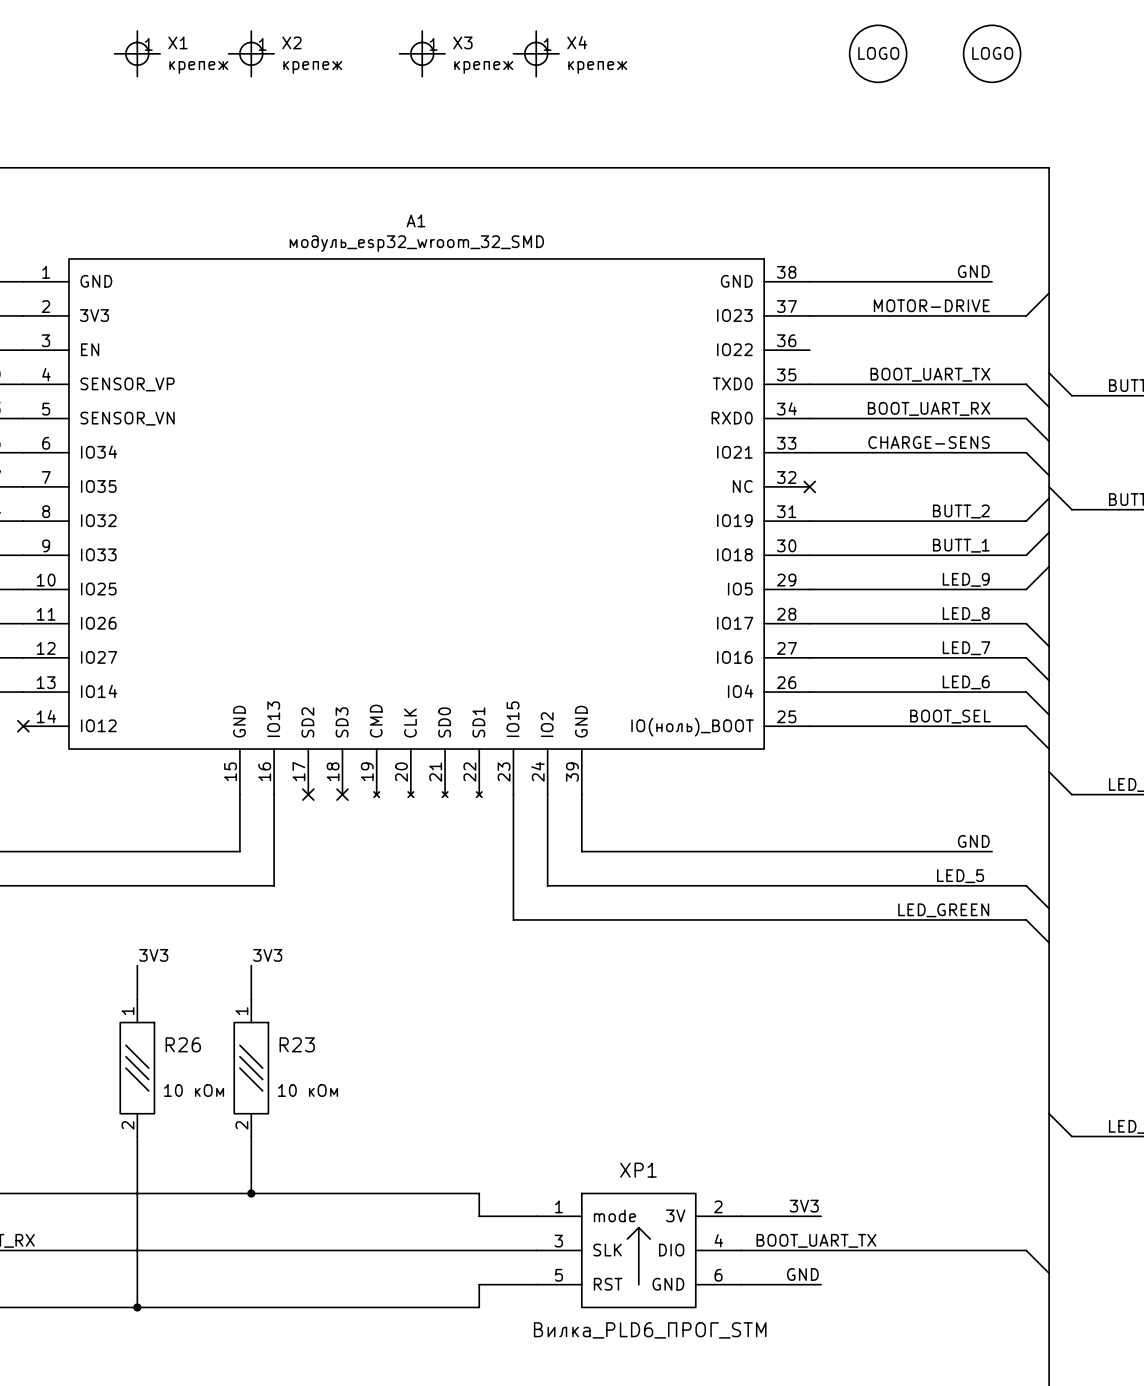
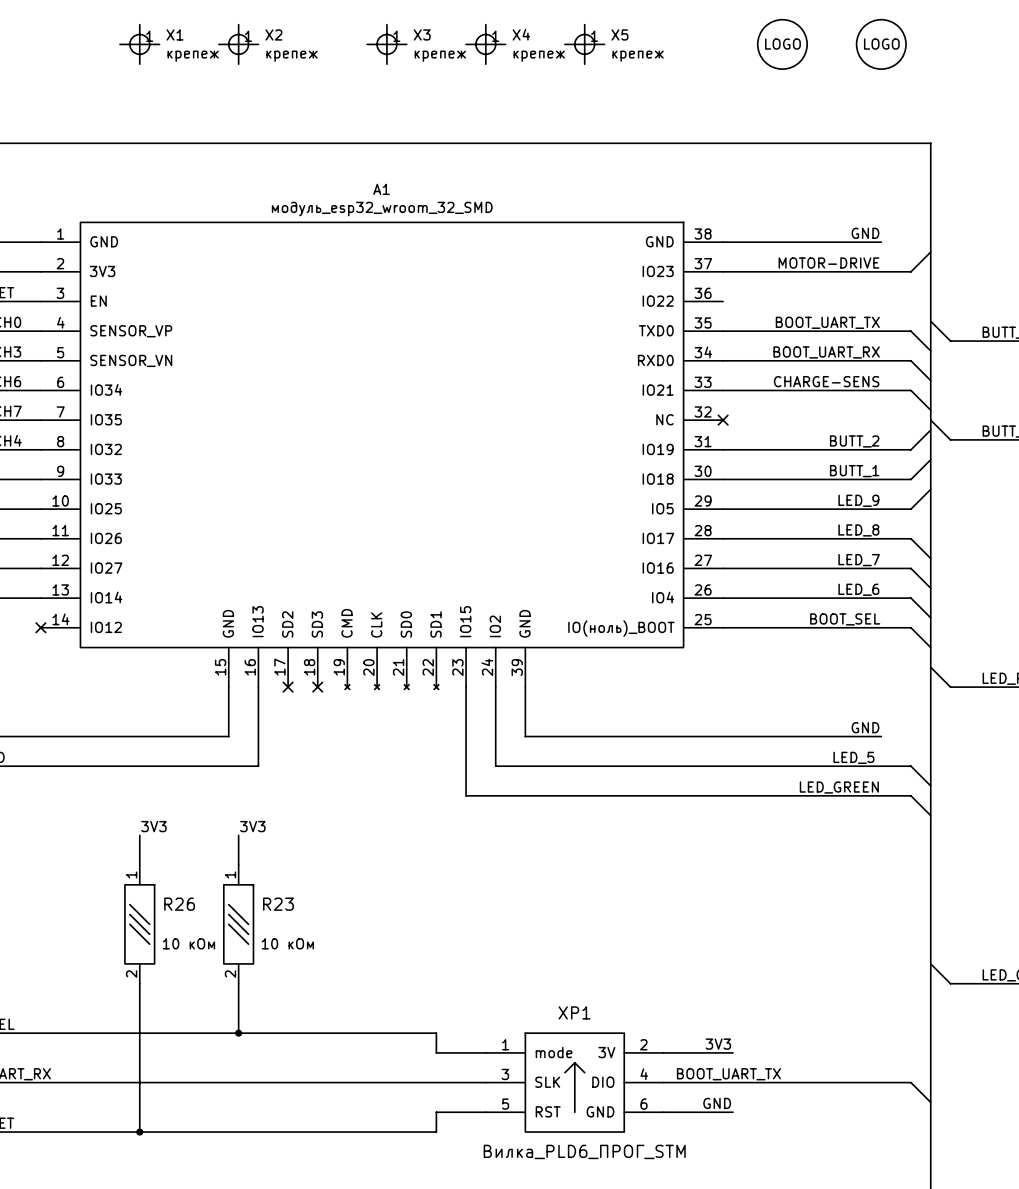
X5: none -> крепеж (584, 44)

